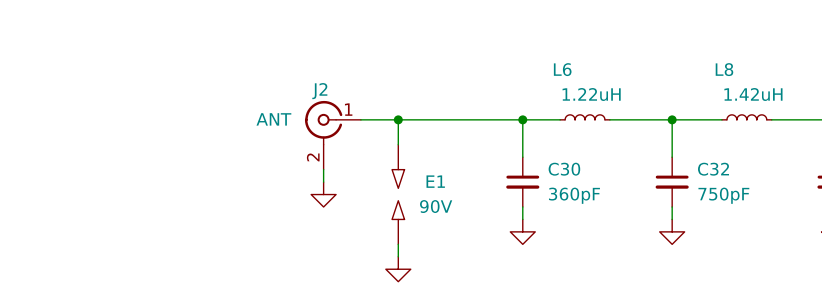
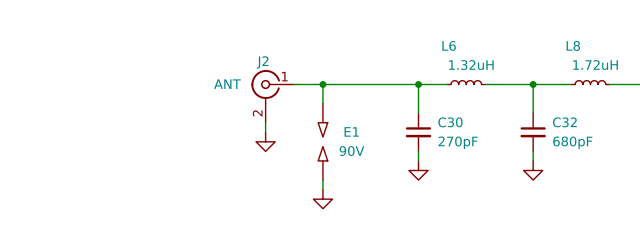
L6 value: 1.22uH (591, 94) -> 1.32uH (471, 65)
L8 value: 1.42uH (753, 94) -> 1.72uH (595, 65)
C30 value: 360pF (574, 195) -> 270pF (458, 142)
C32 value: 750pF (723, 195) -> 680pF (572, 142)

